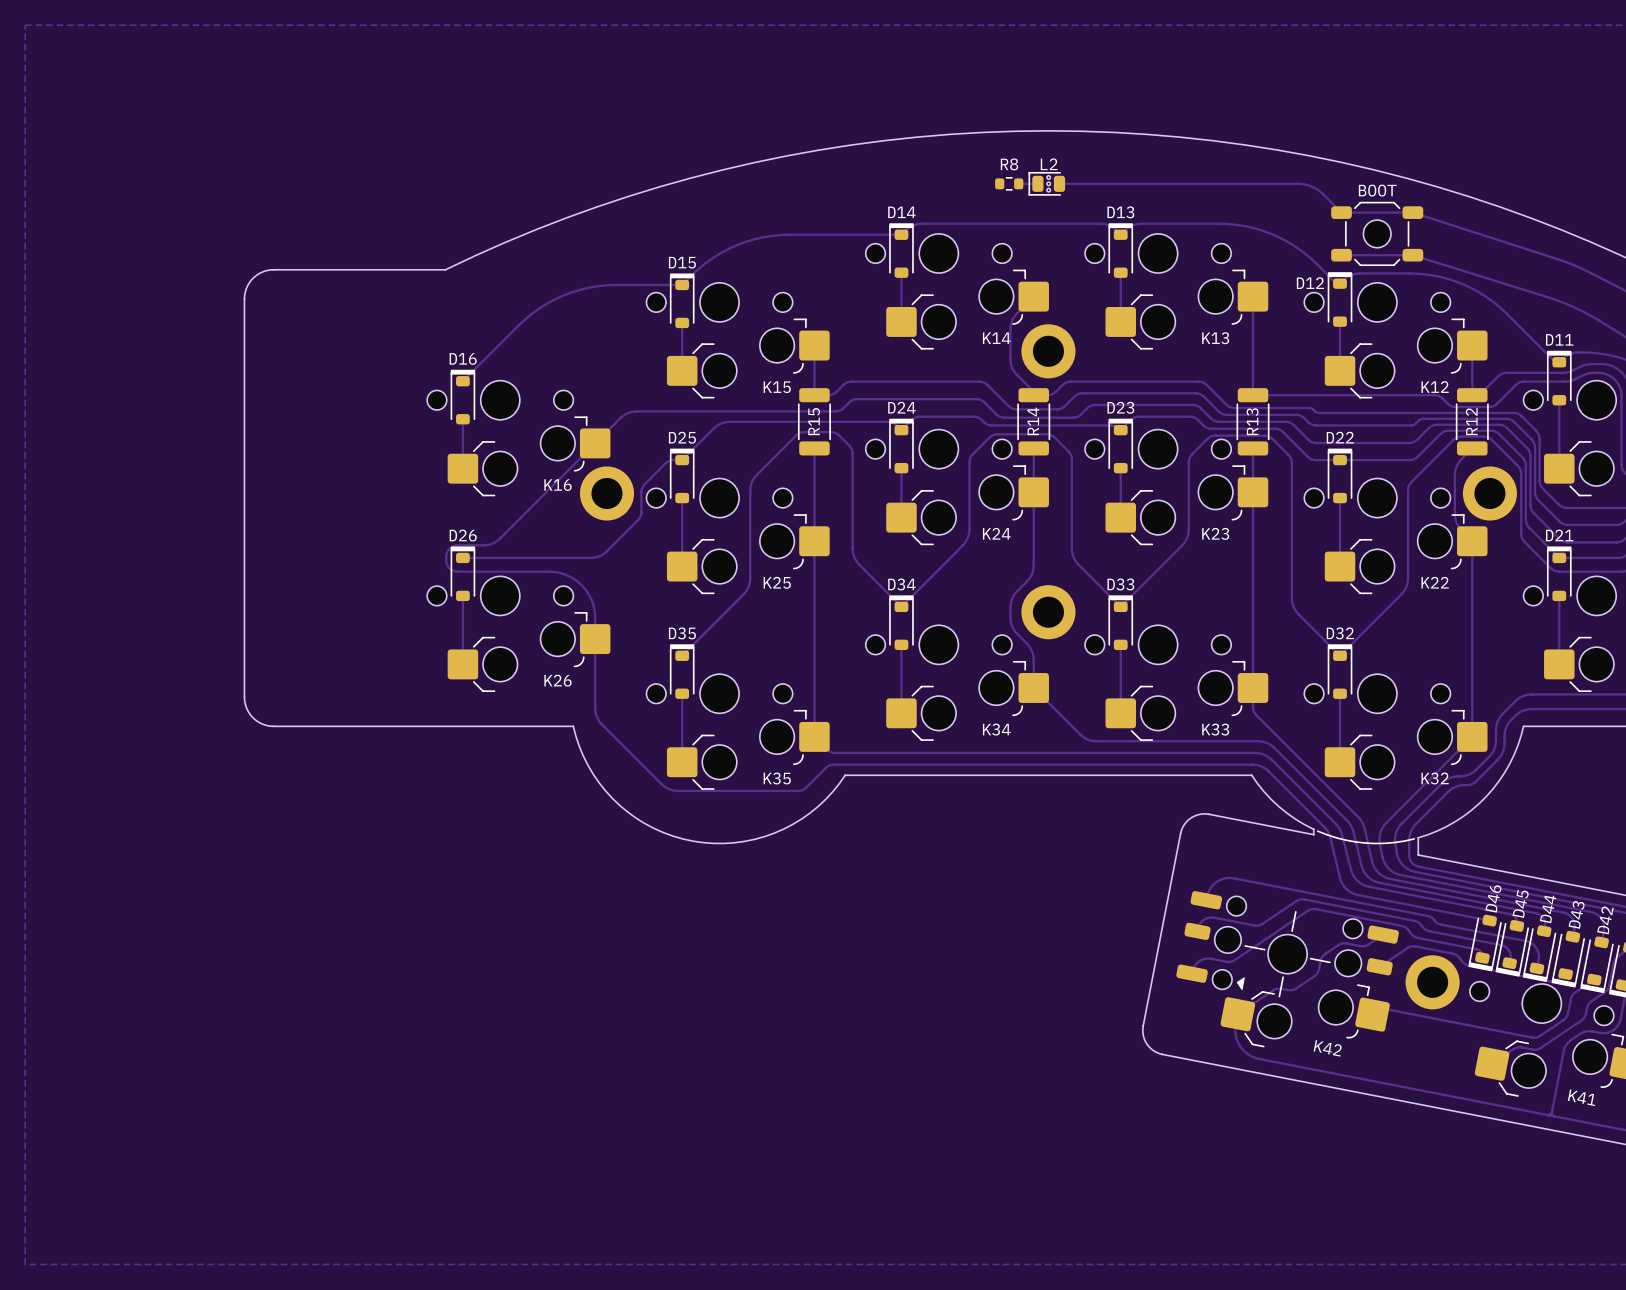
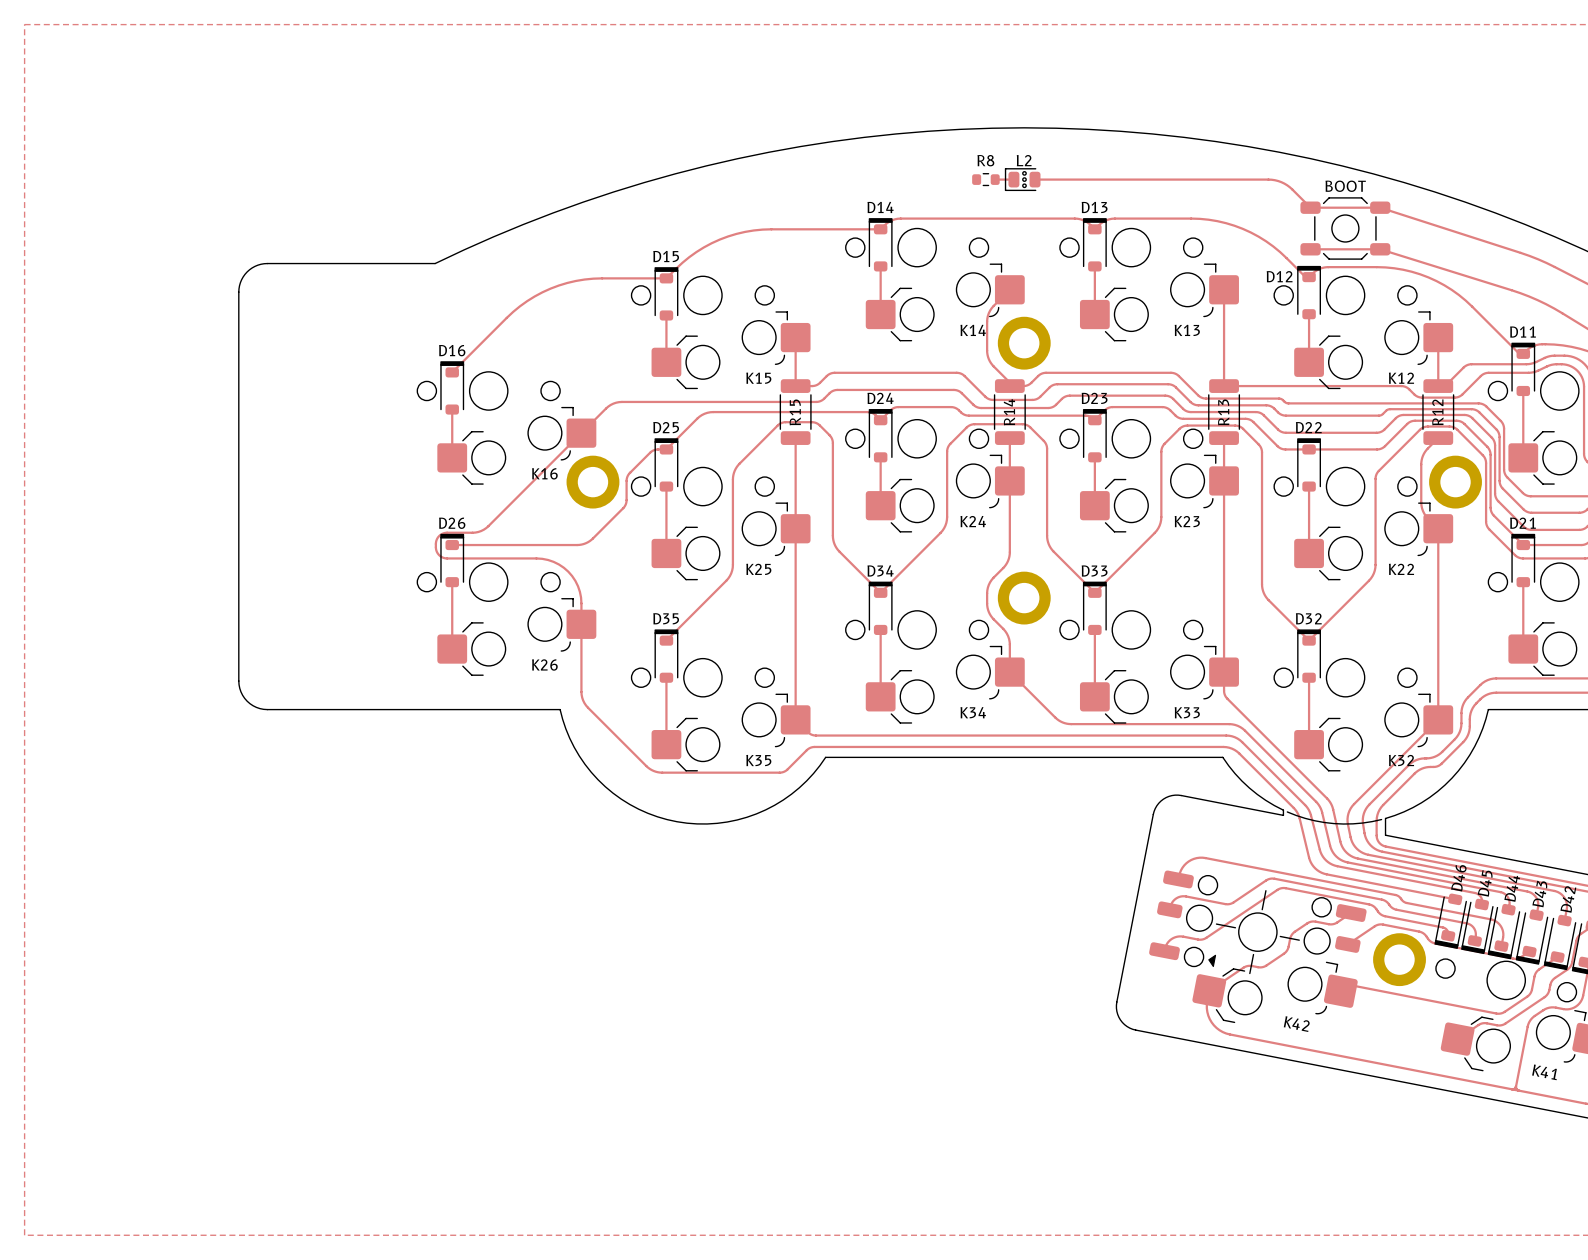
track: (854, 381) (846, 382) (834, 393) (828, 395) -> (834, 372) (828, 374) (815, 385) (795, 386)

